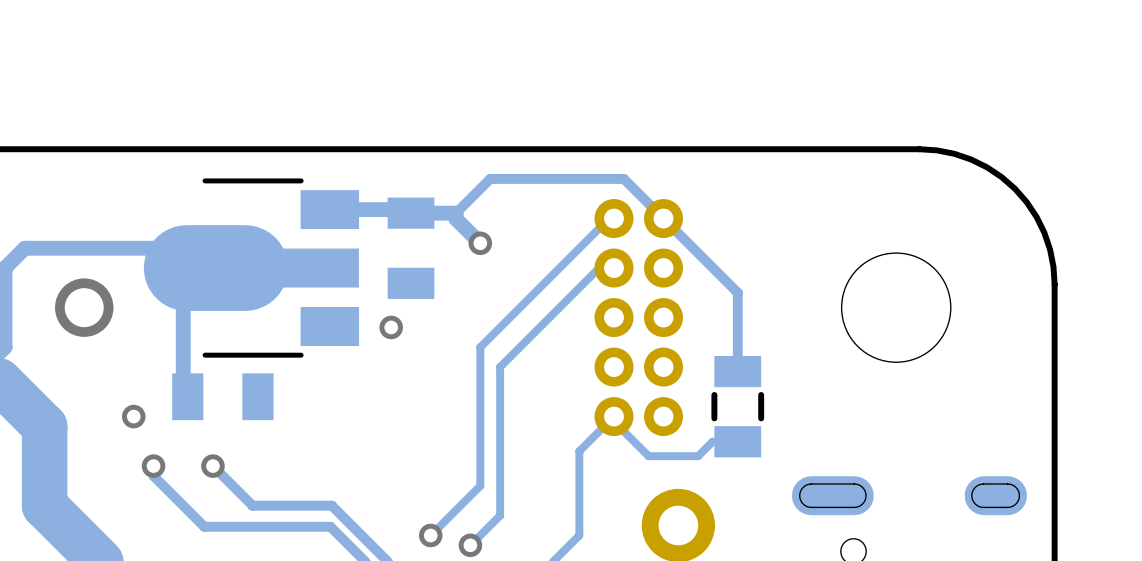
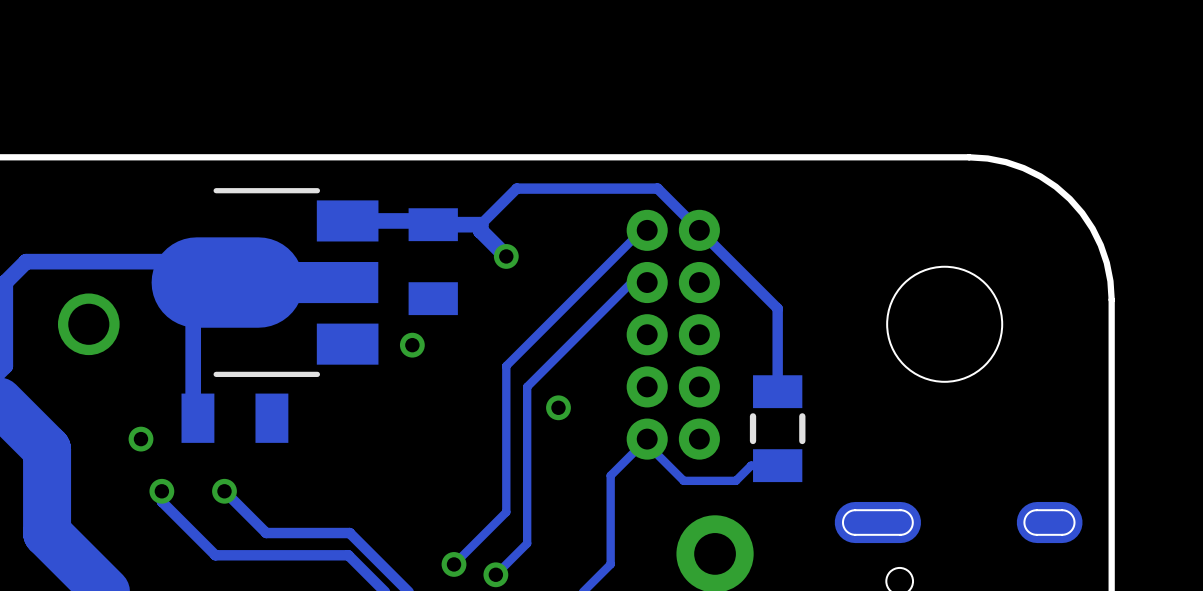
via: none -> (558, 407)

